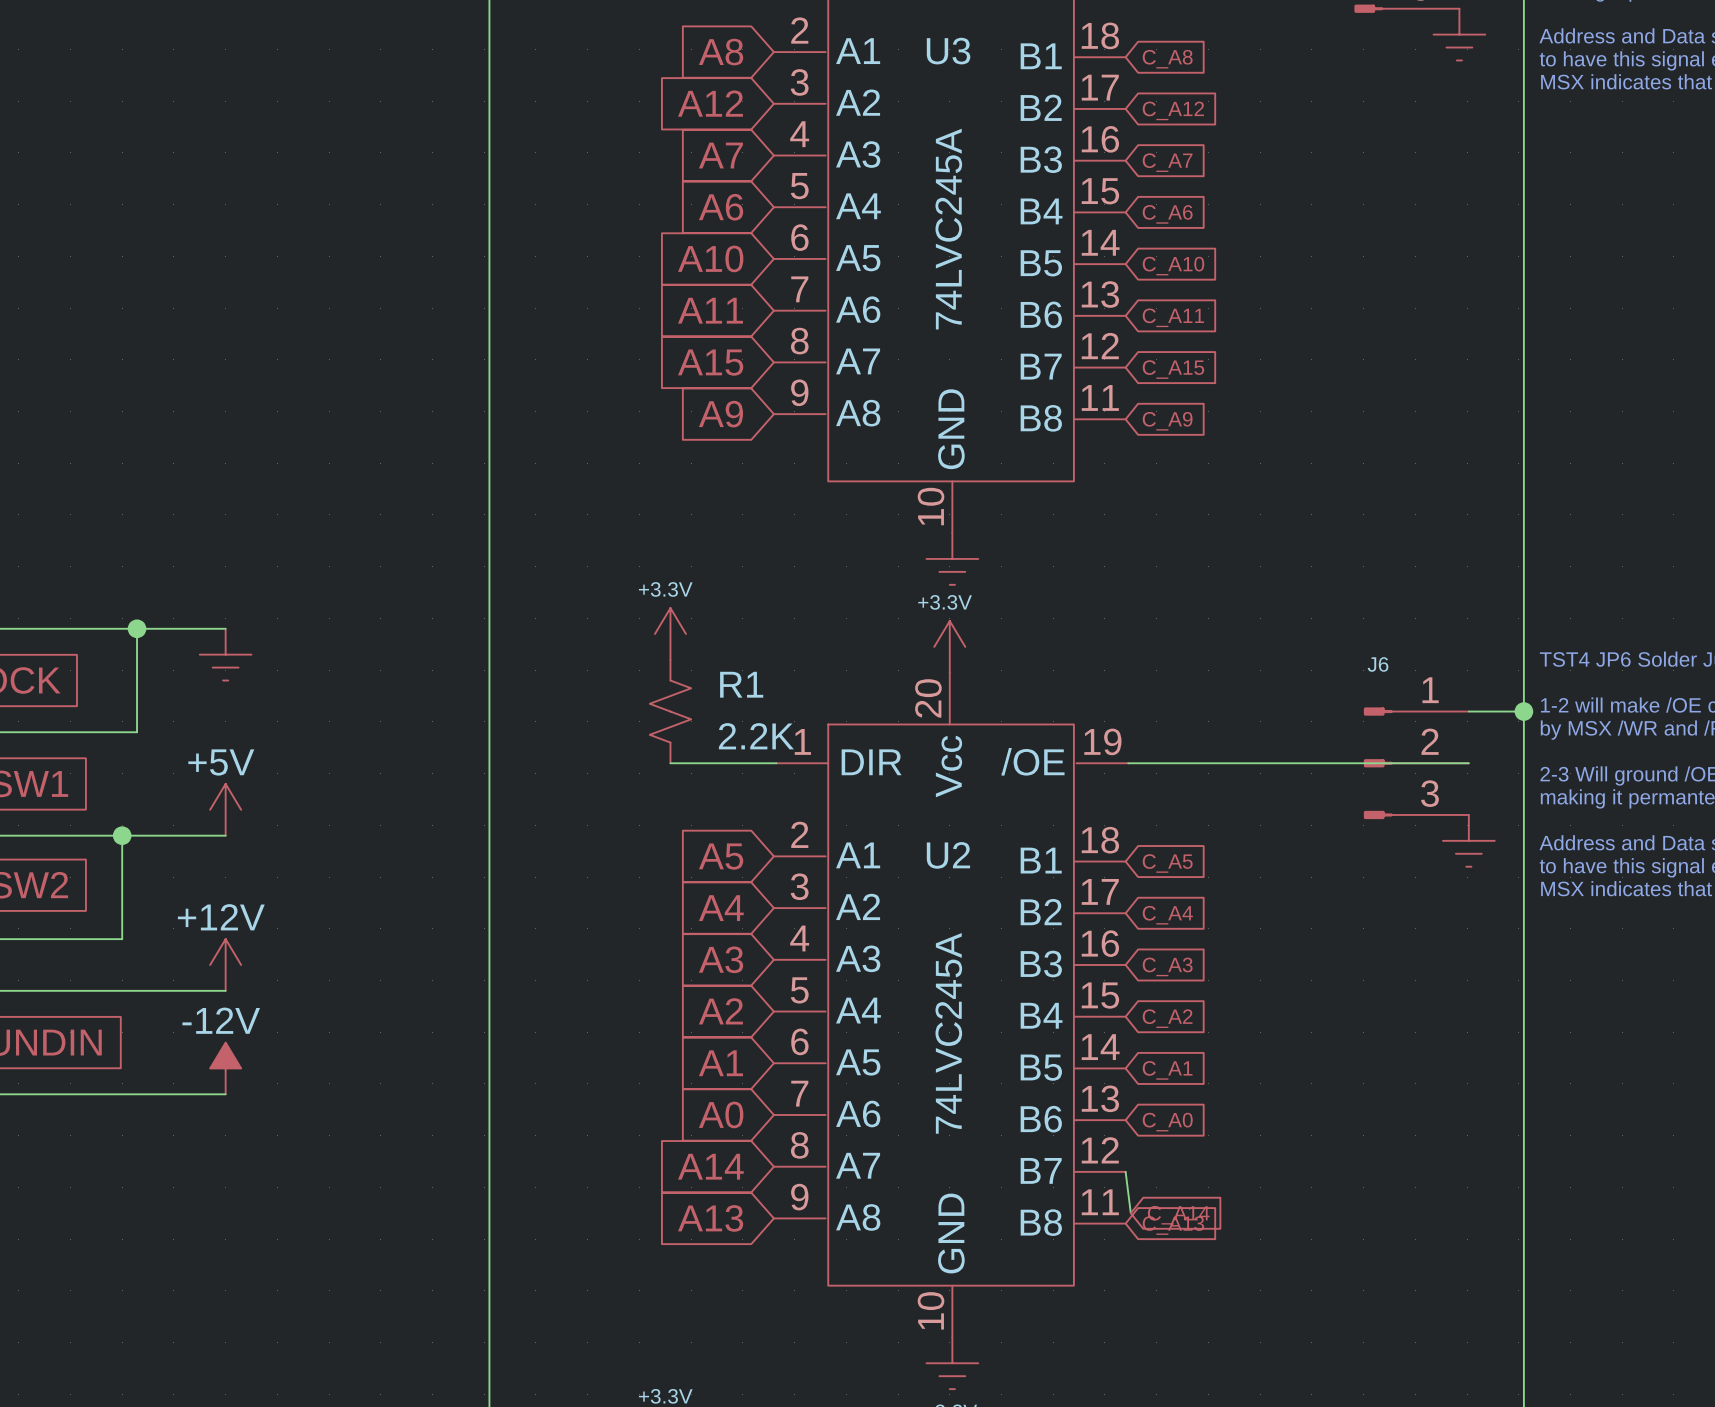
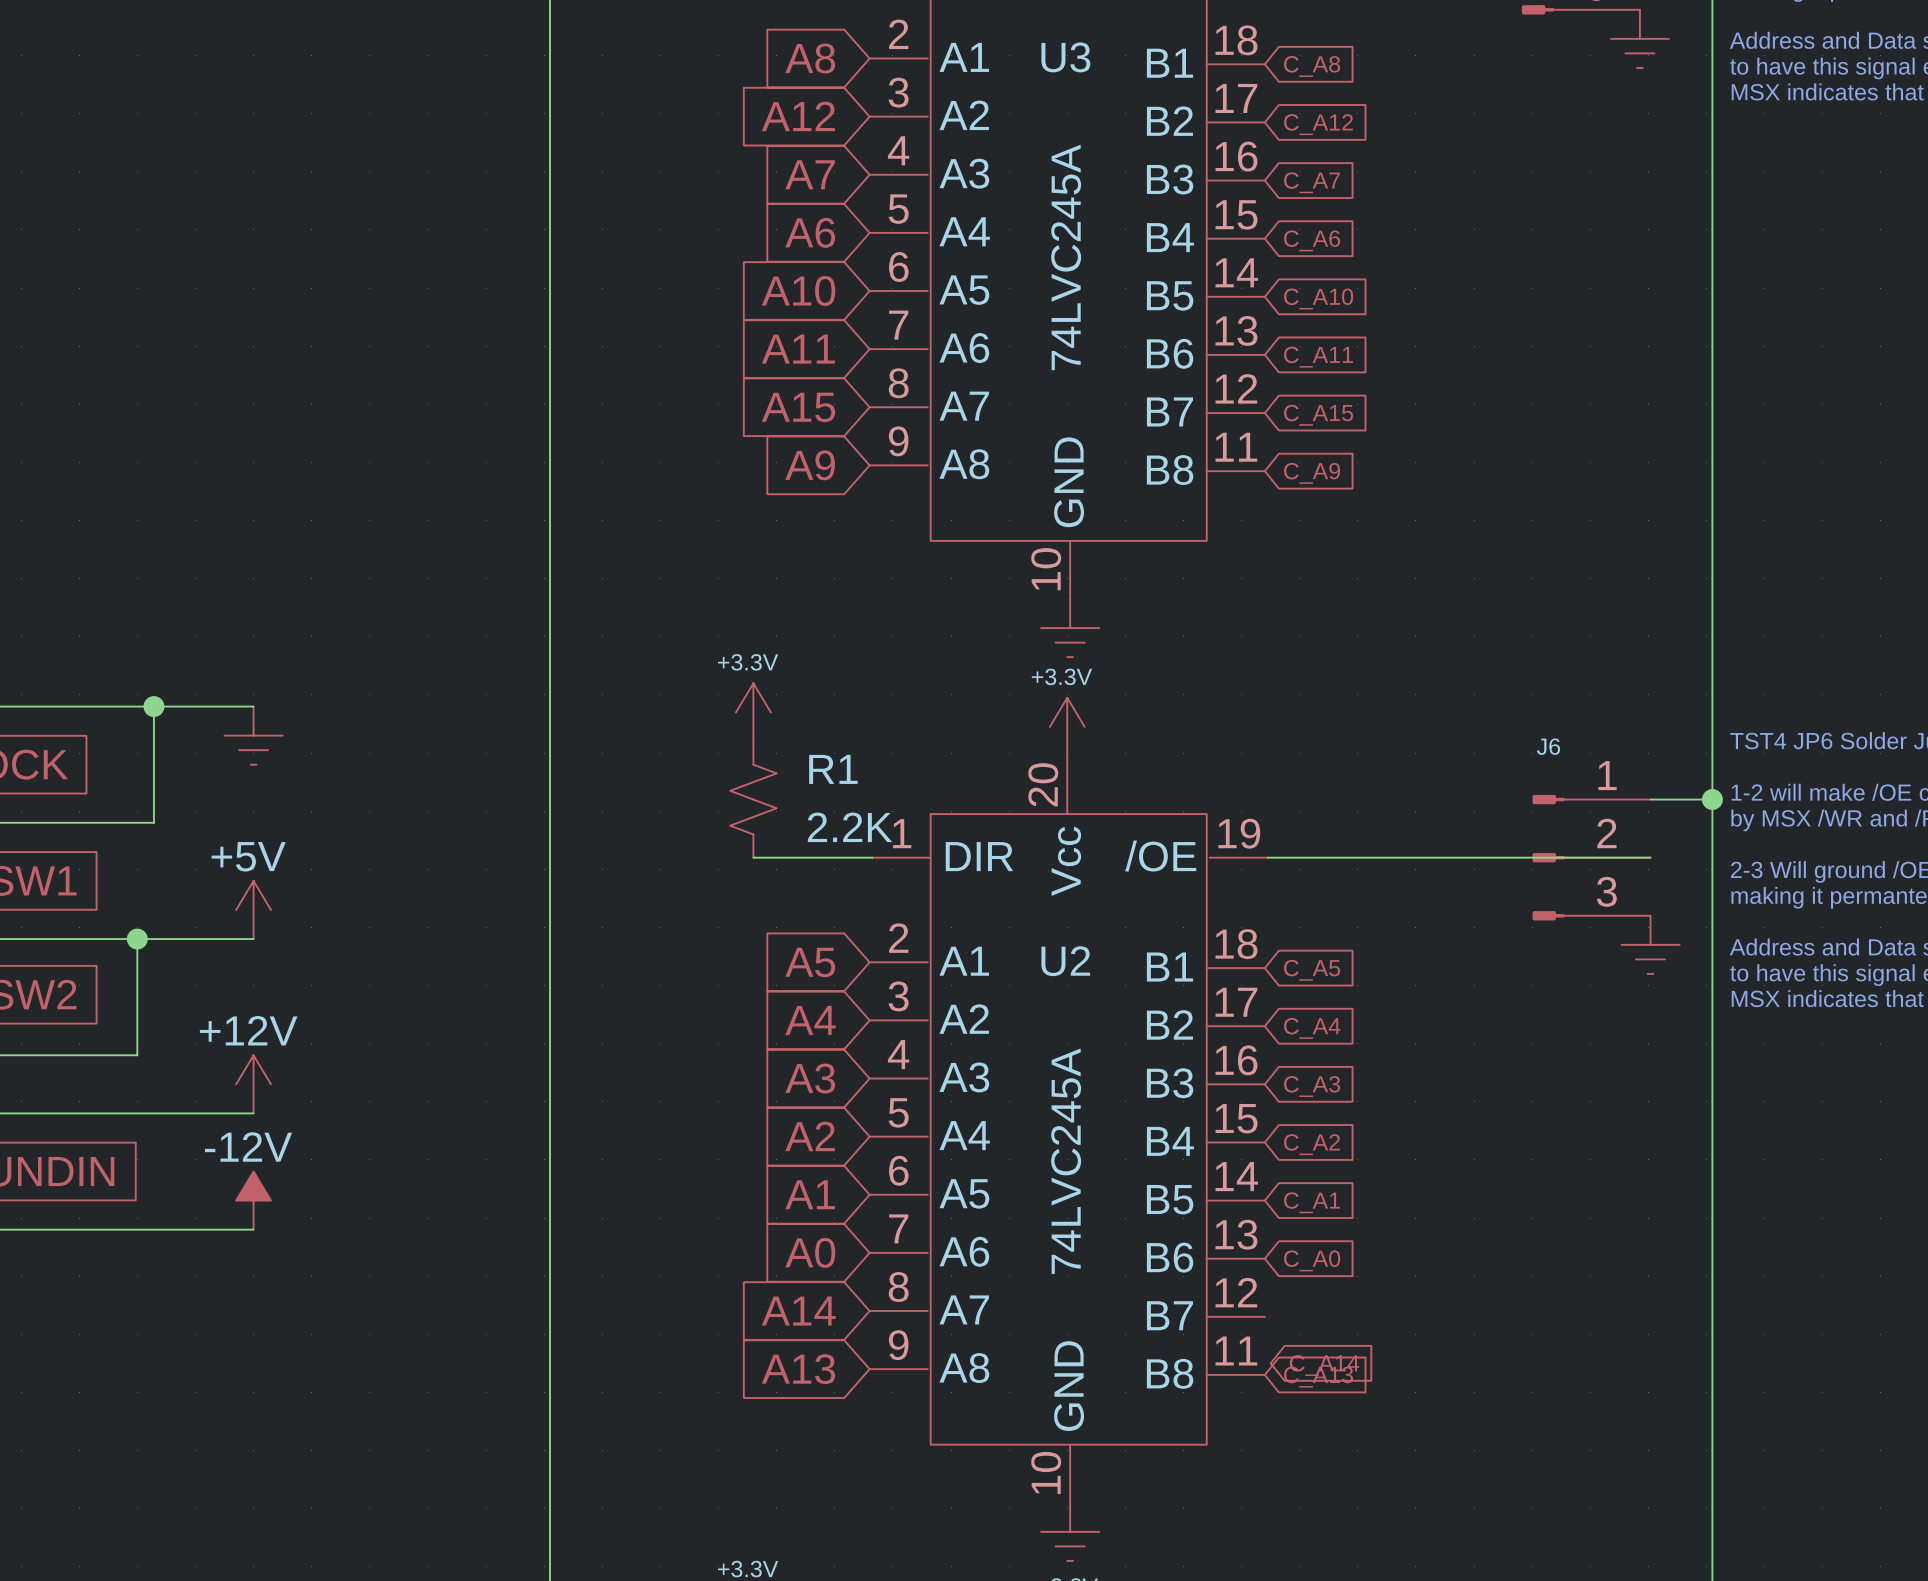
wire: (1125, 1171) (1130, 1213) -> none

